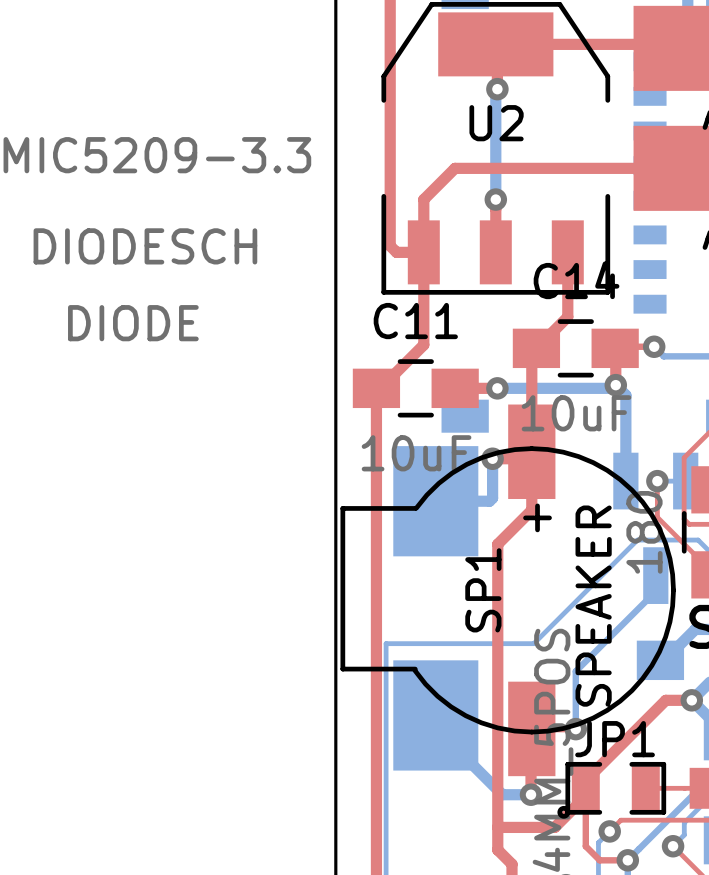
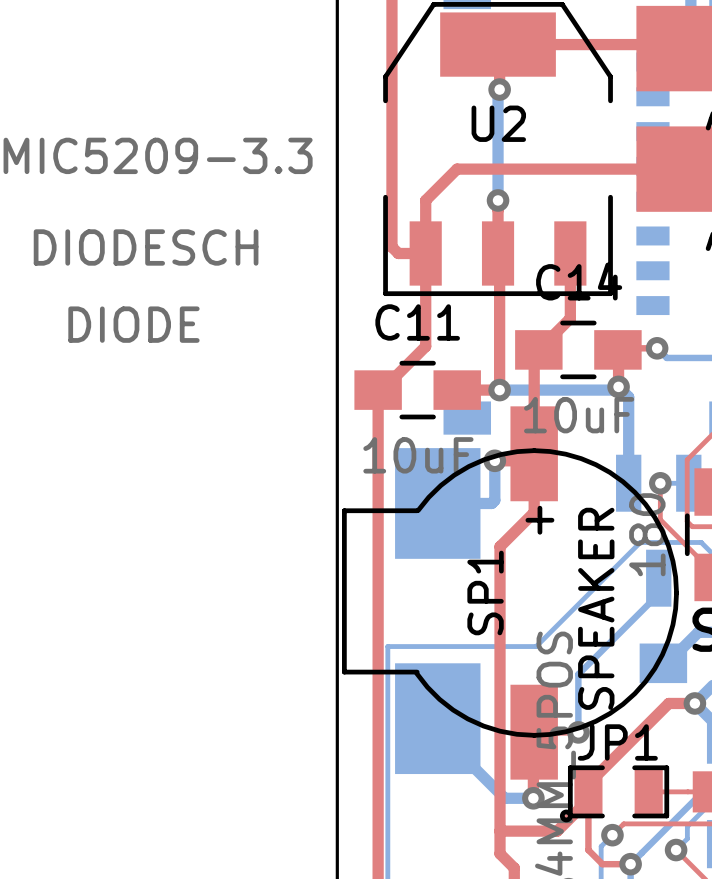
top track: none -> (498, 253) (499, 255) (499, 390)

